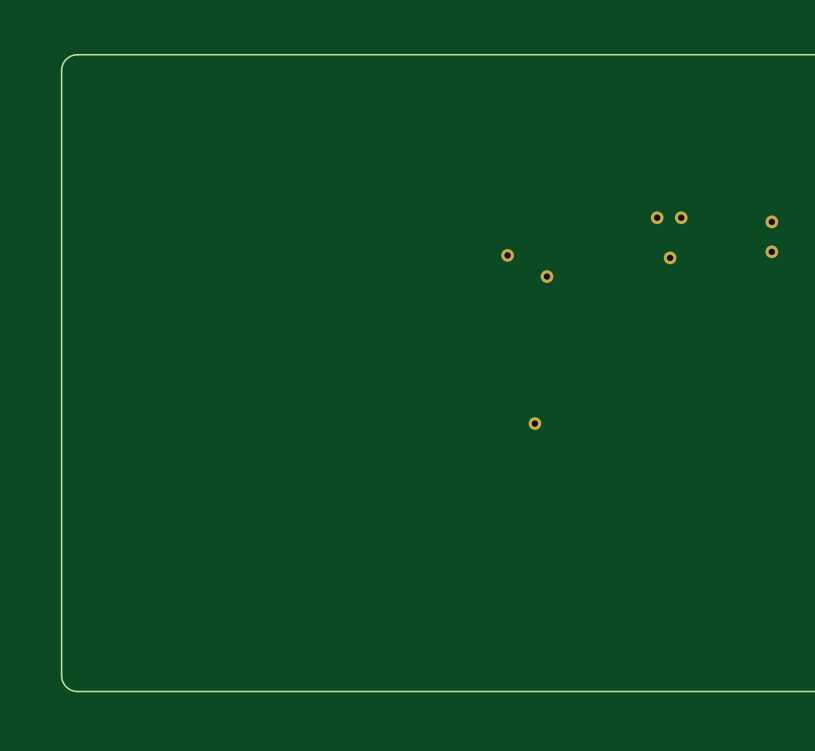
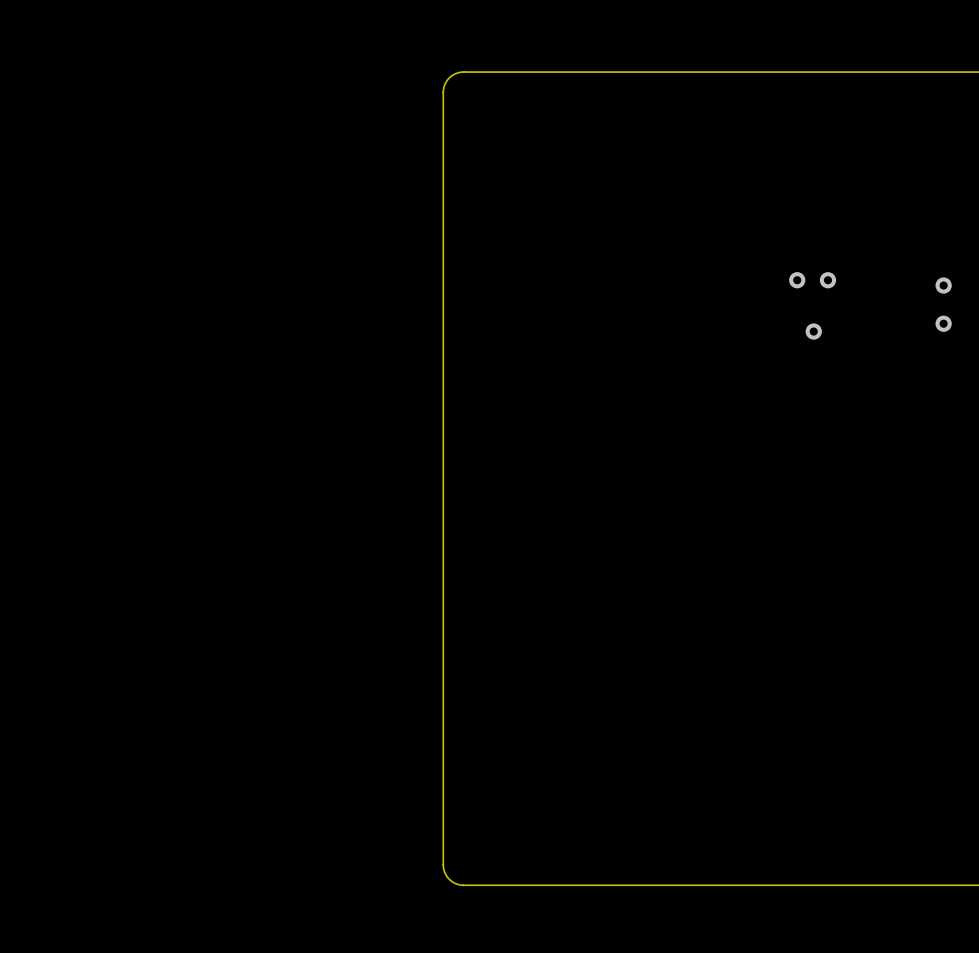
board edge: (395, 54) (77, 54) (66, 59) (61, 70) (61, 675) (63, 682) (69, 689) (77, 691) (395, 691) -> (463, 72) (456, 73) (449, 78) (445, 83) (443, 92) (443, 864) (445, 873) (449, 879) (454, 883) (463, 885)
via: (507, 255) -> none
via: (546, 276) -> none
via: (534, 423) -> none

